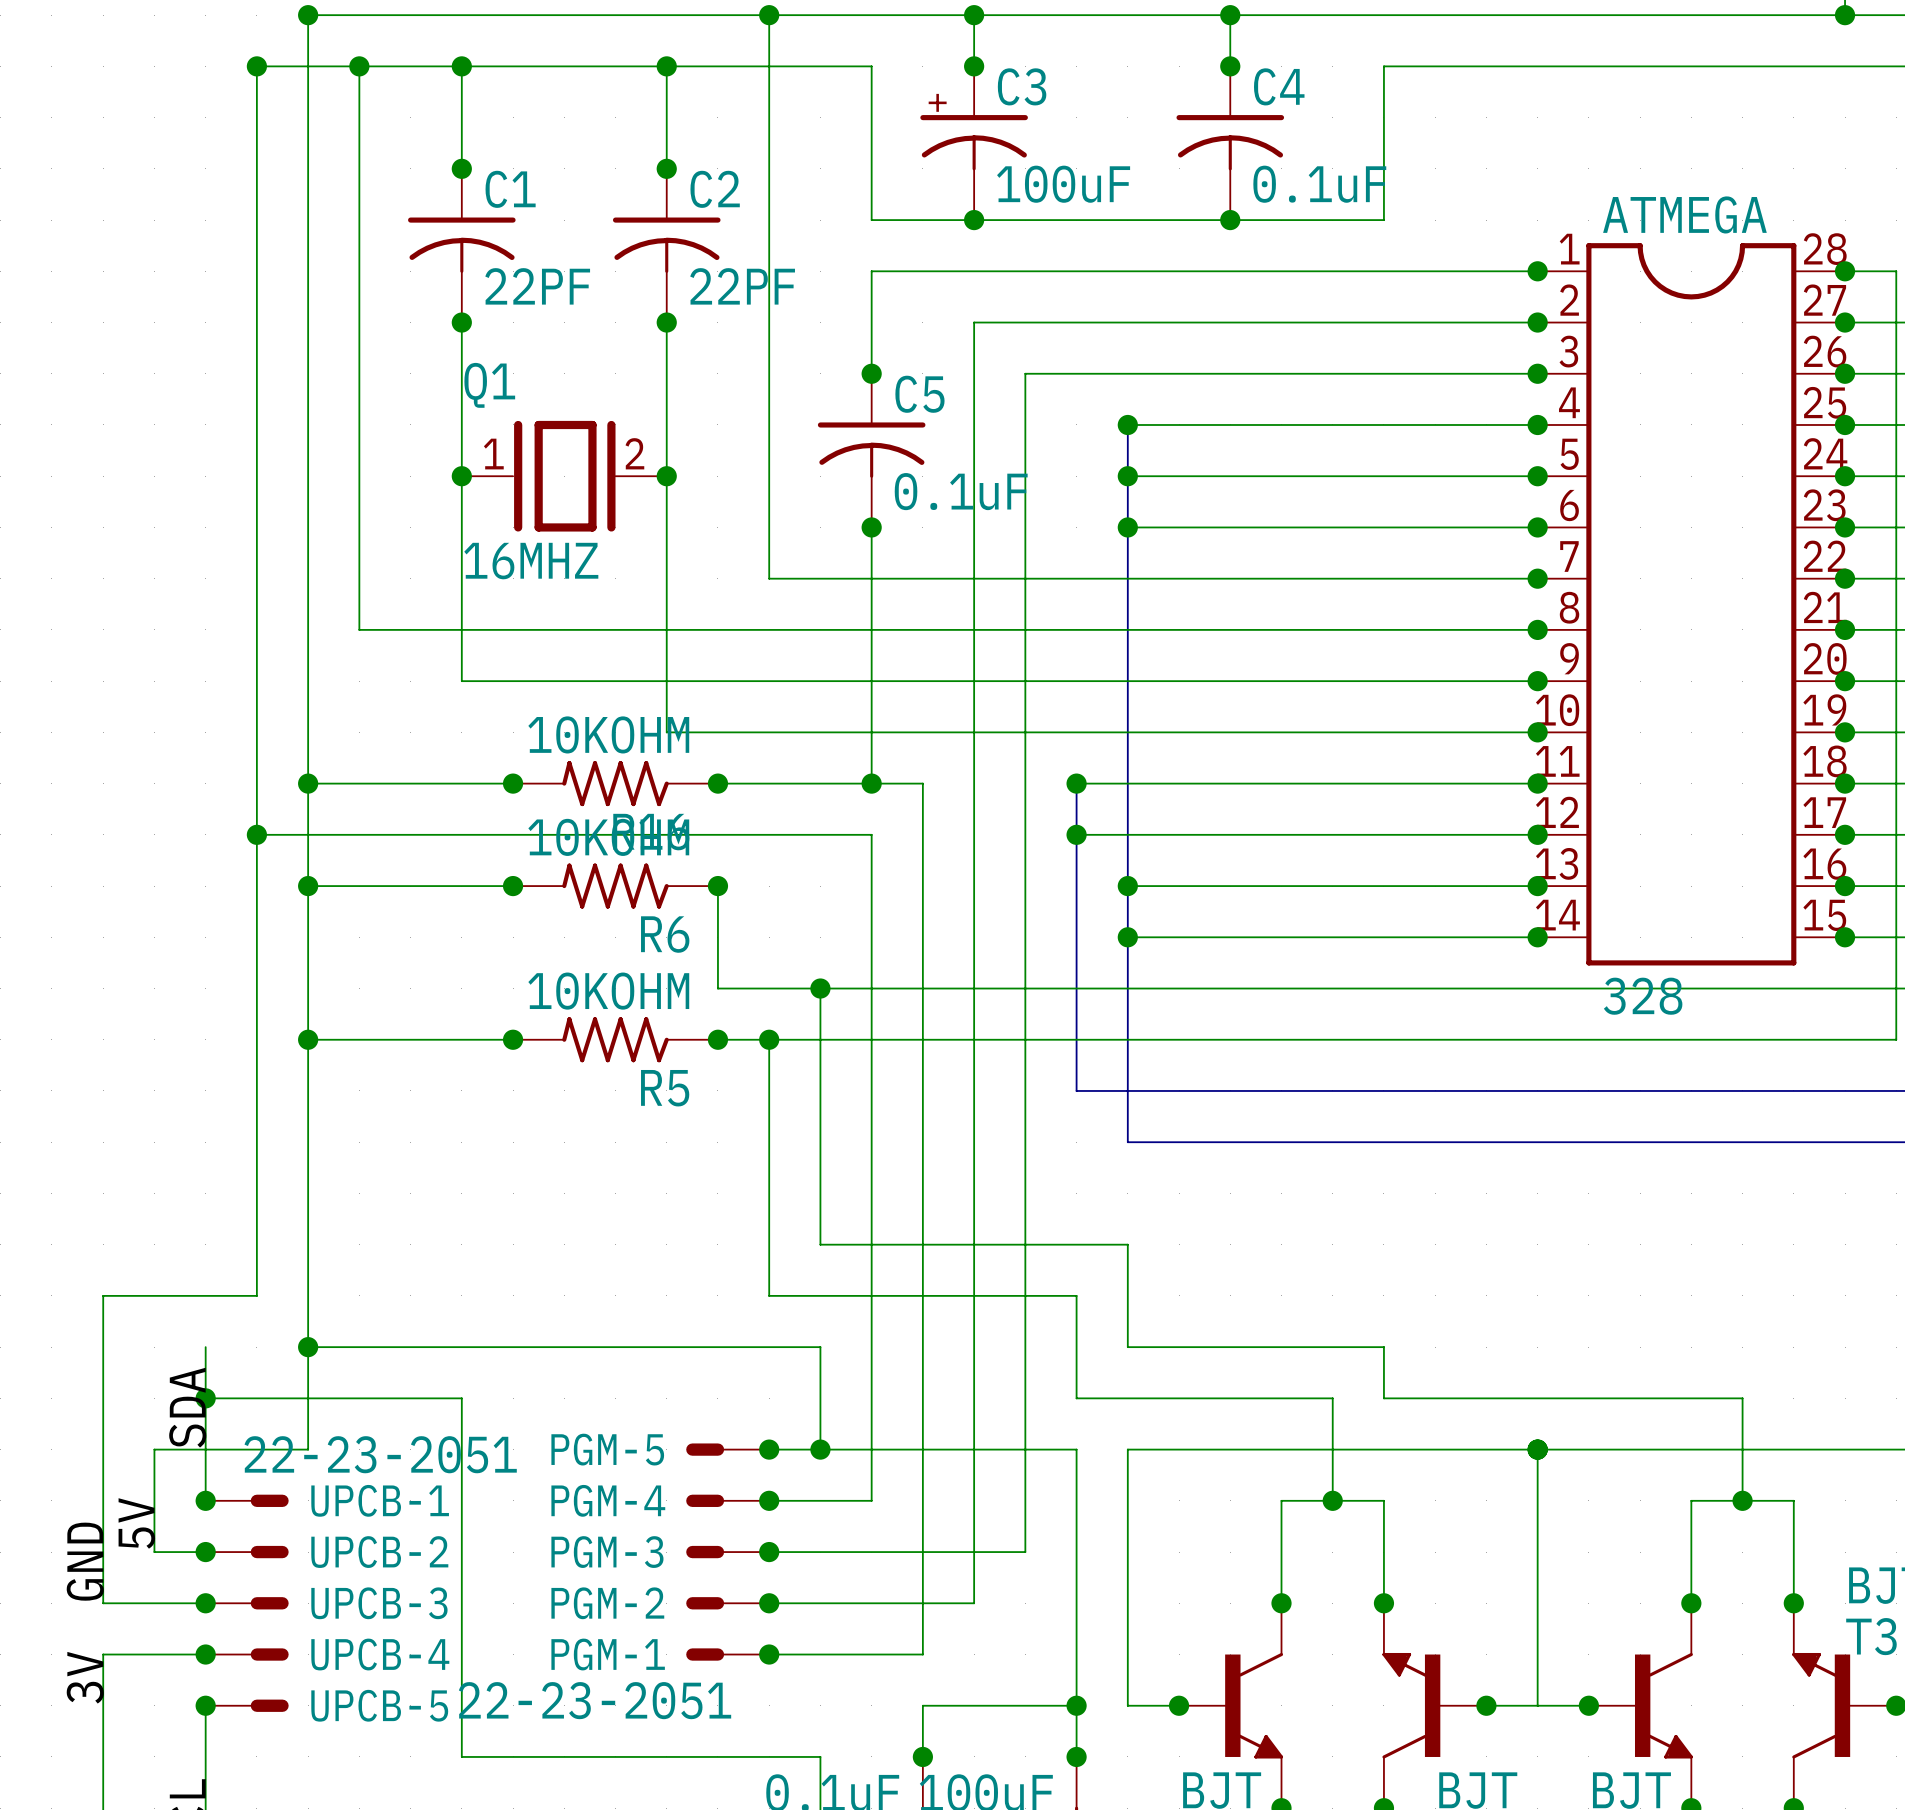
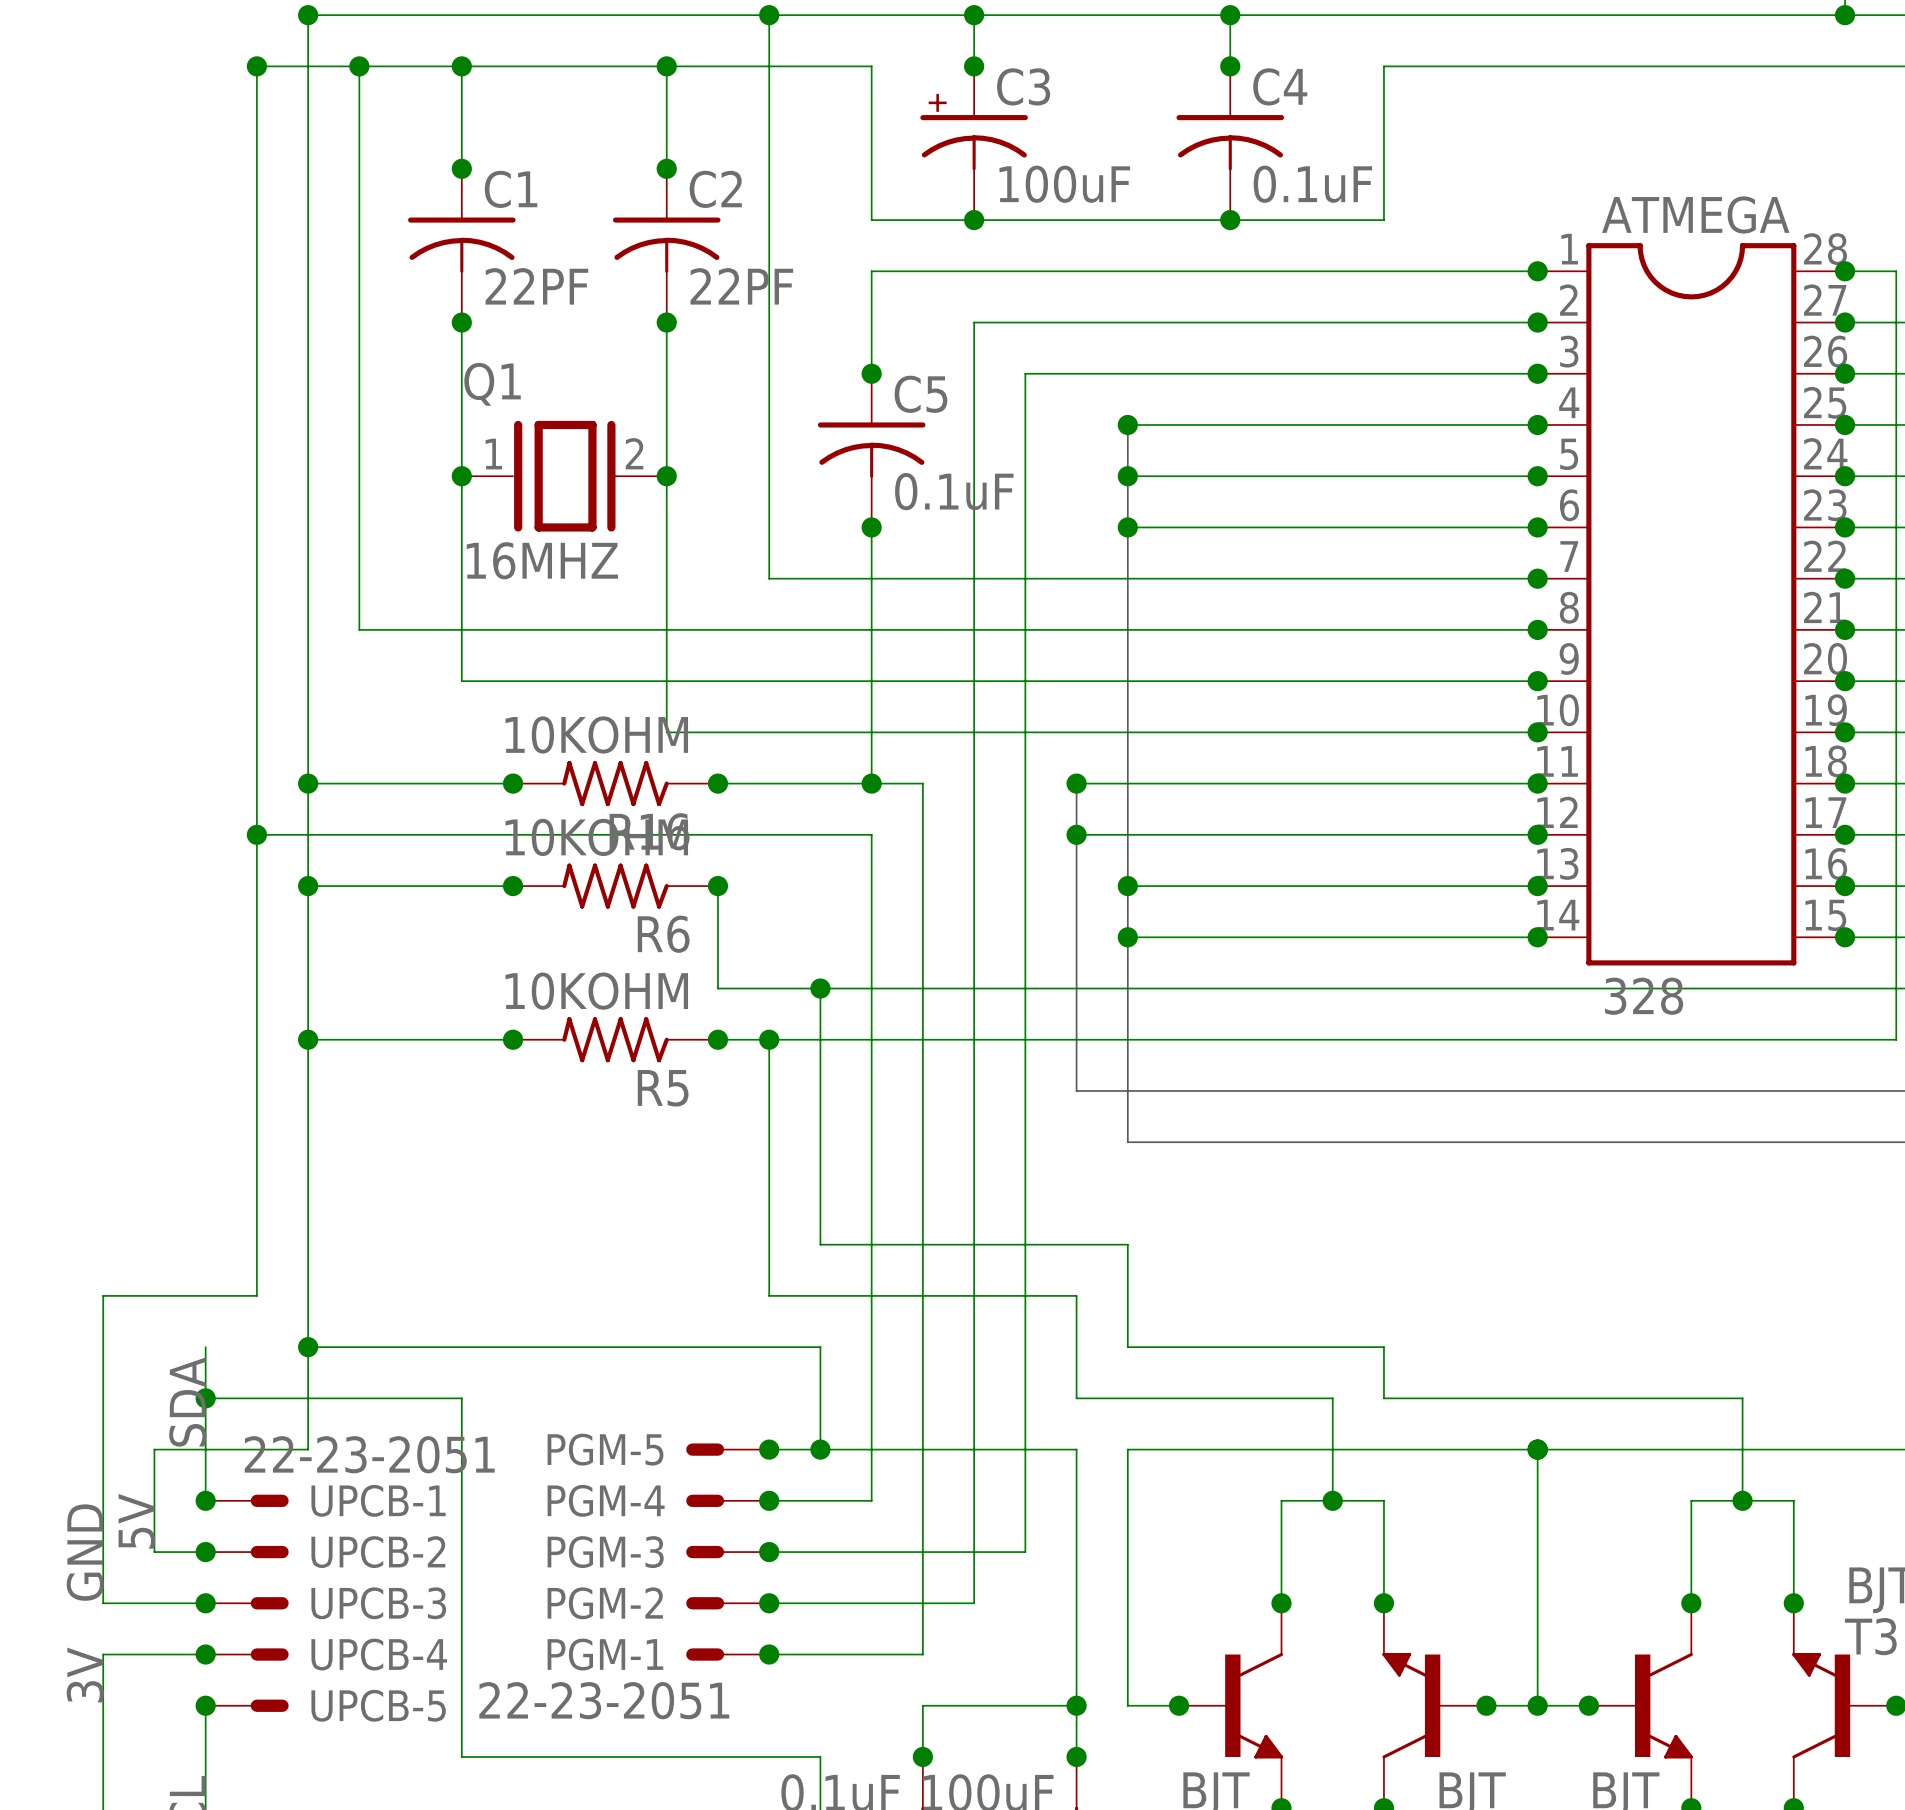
junction: none -> (1537, 1705)

